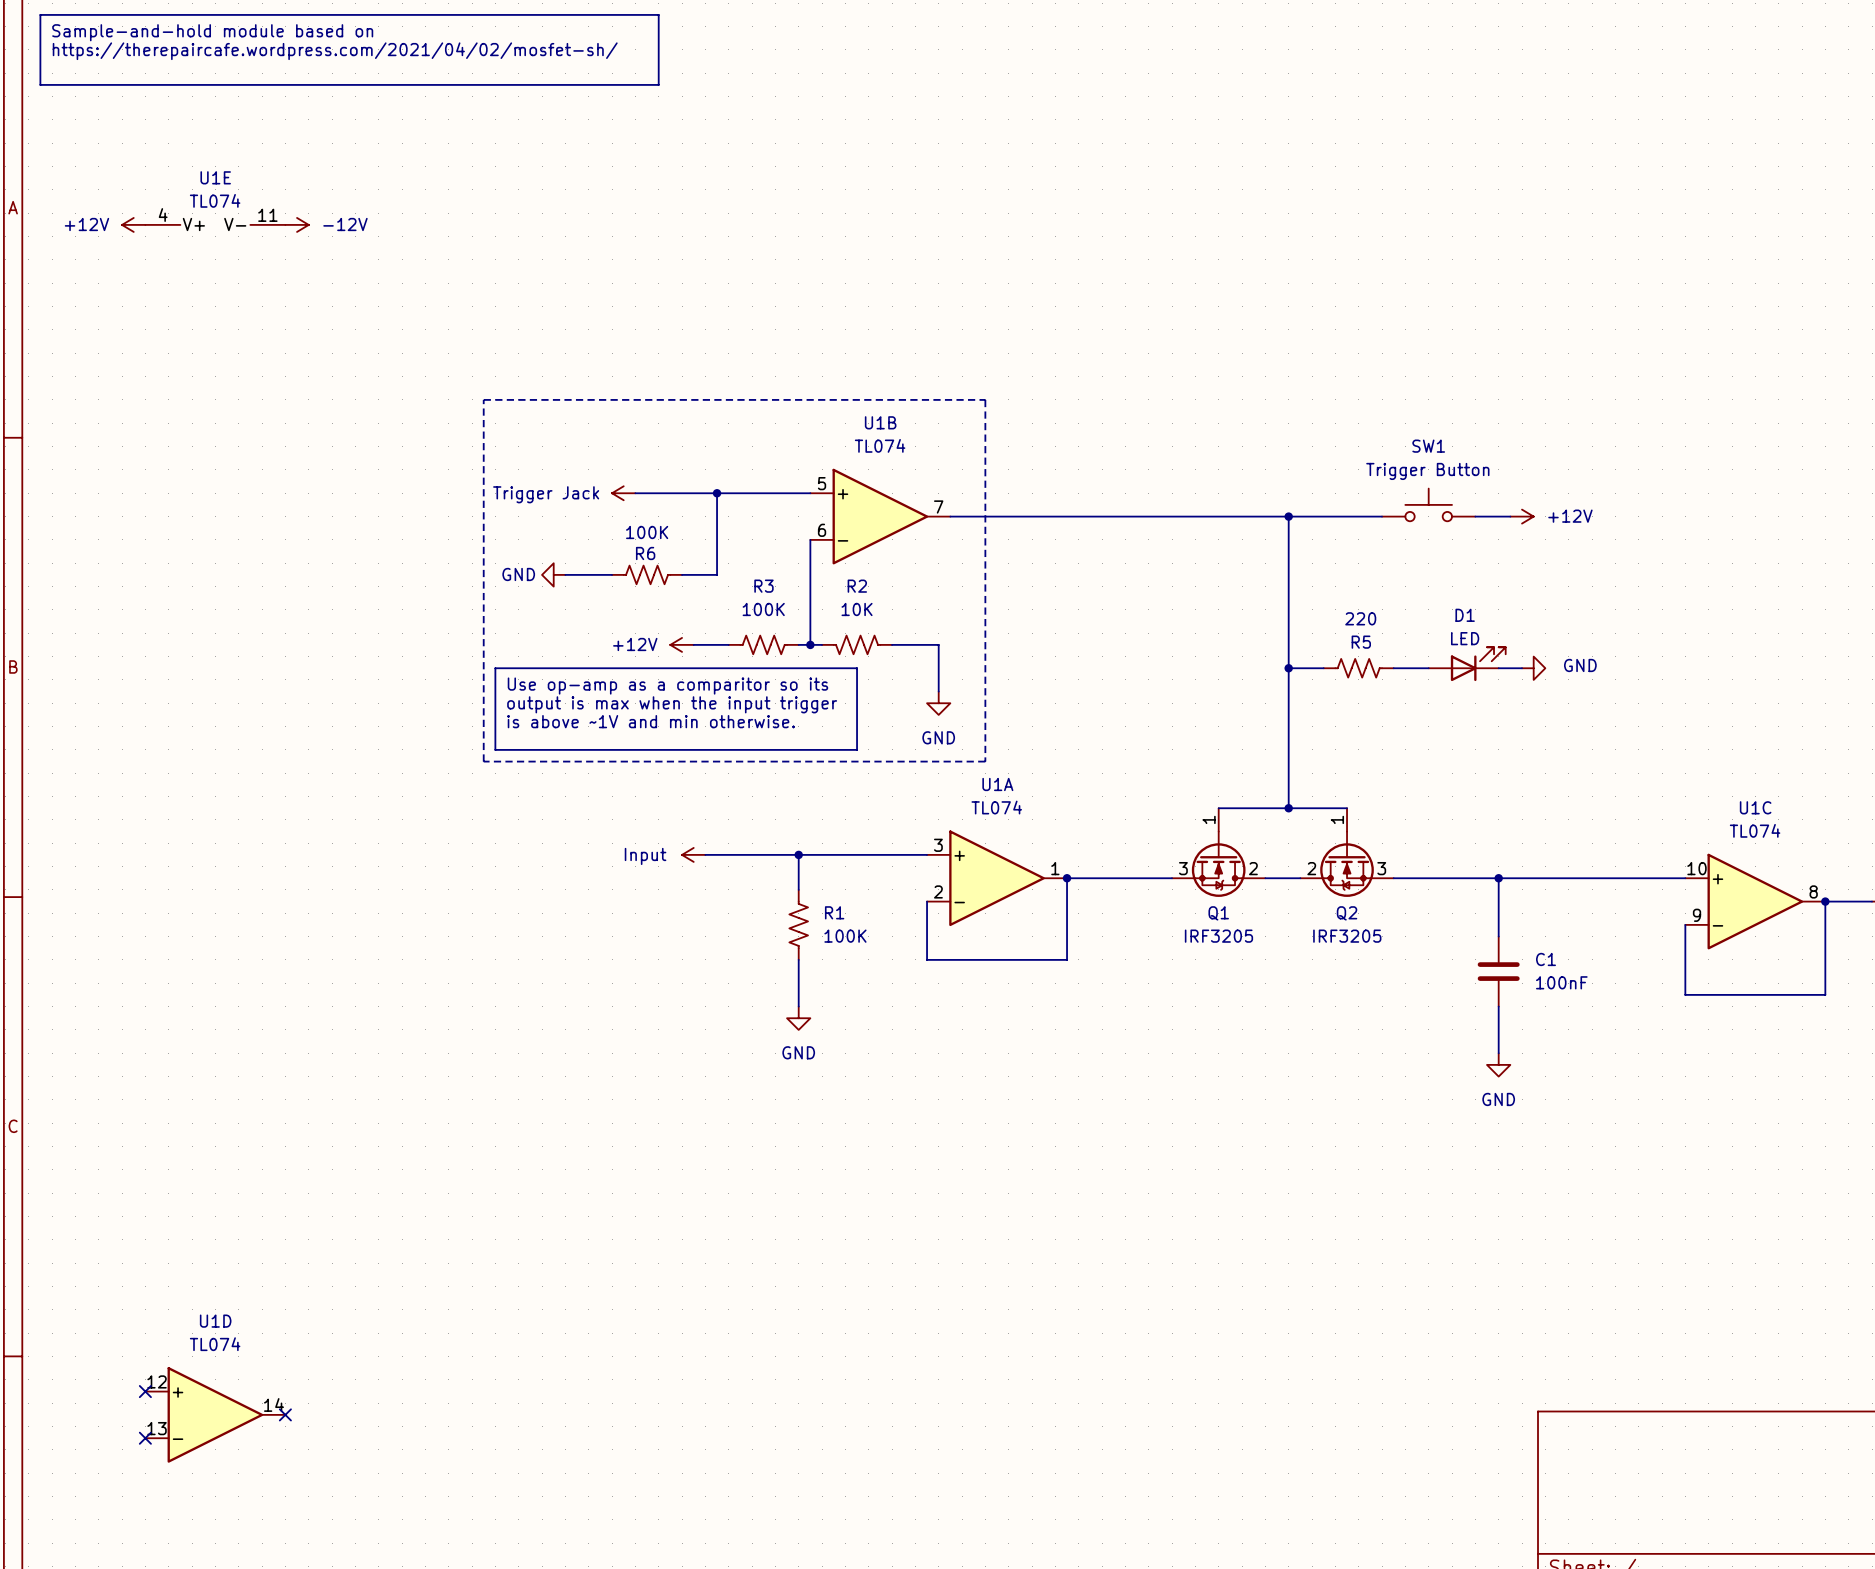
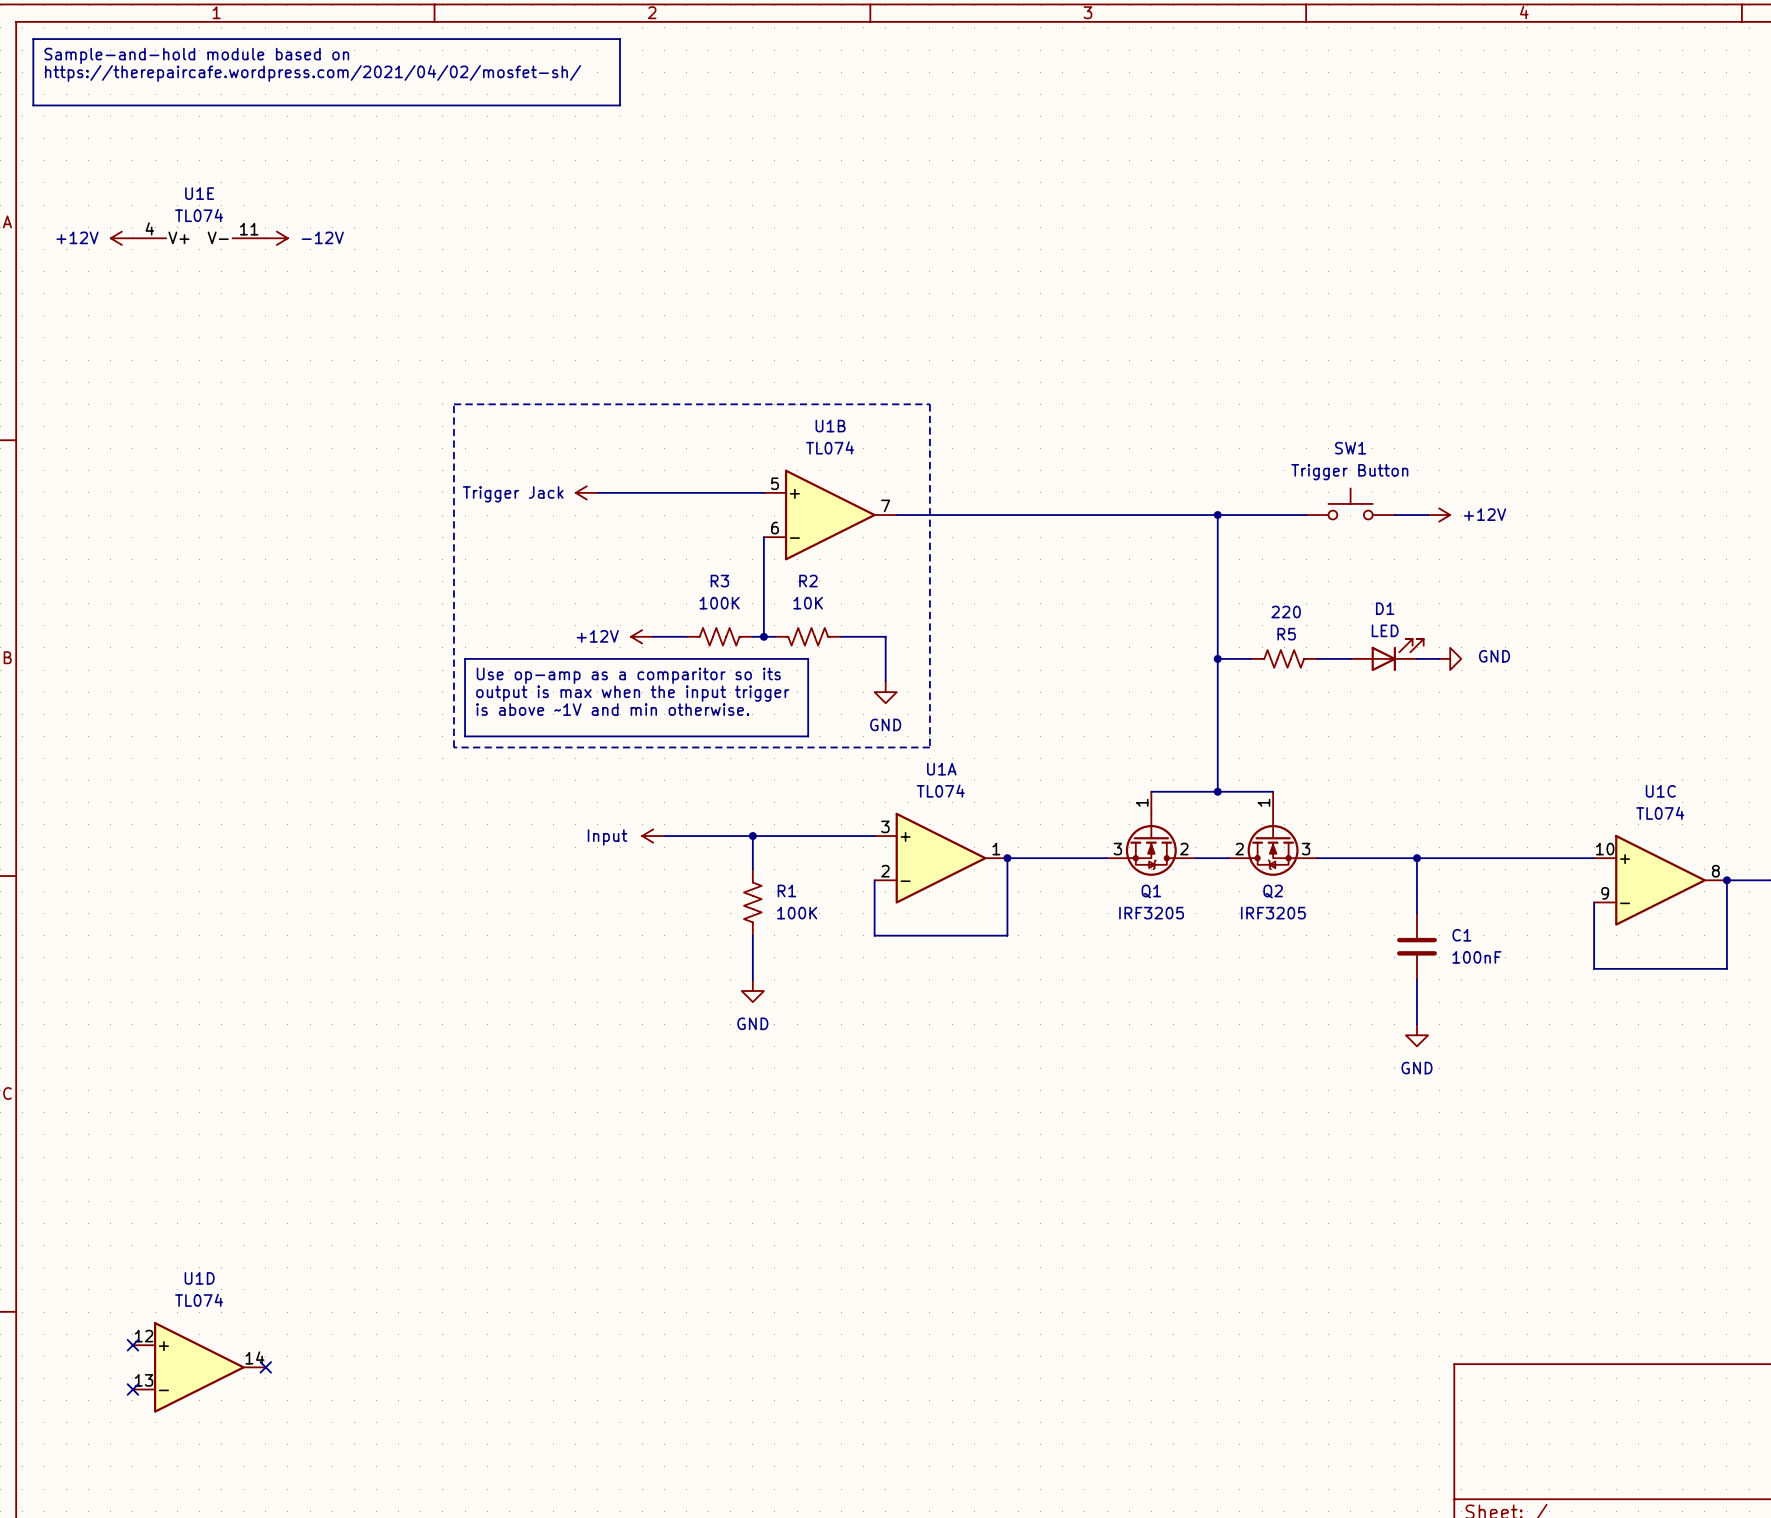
wire: (717, 493) (717, 574) (682, 574) -> none
junction: (717, 493) -> none
power symbol: GND (553, 574) -> none
wire: (565, 574) (612, 574) -> none
R6: 100K (647, 574) -> none

